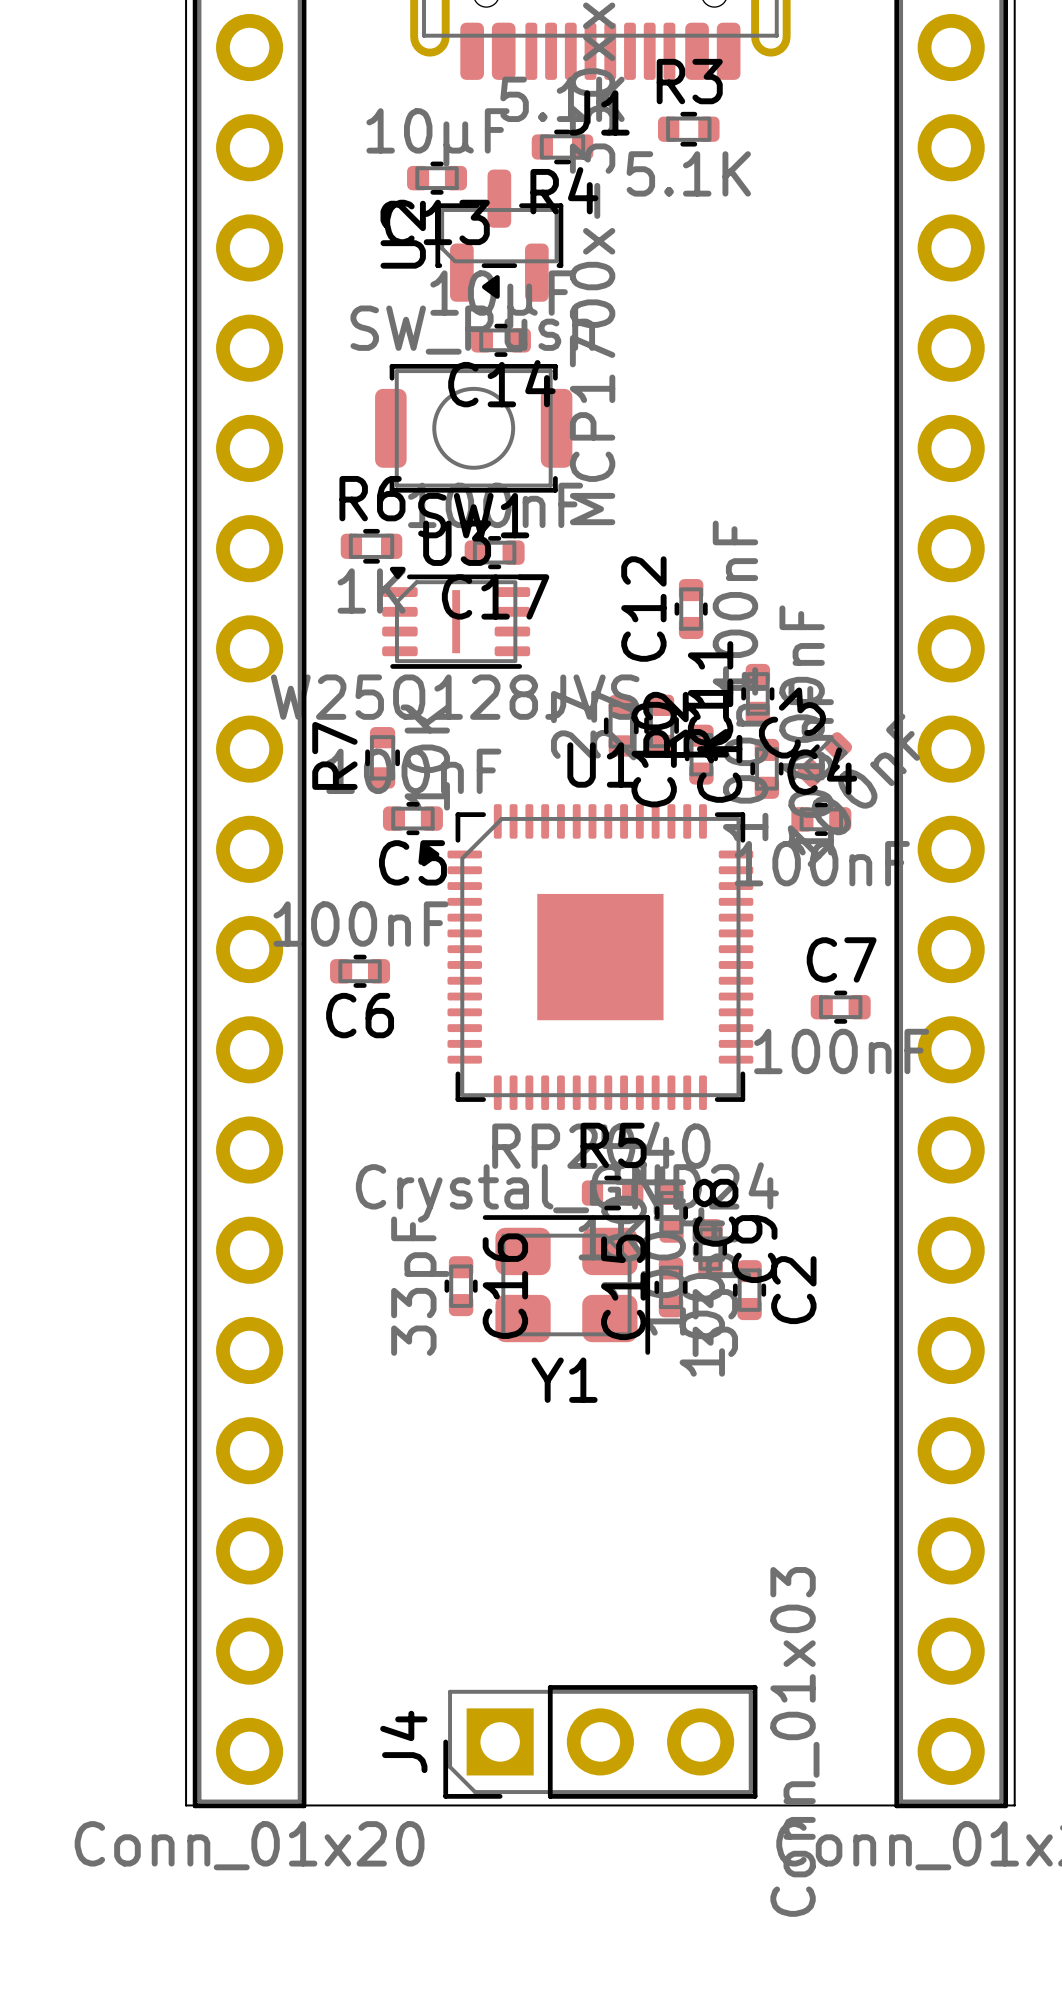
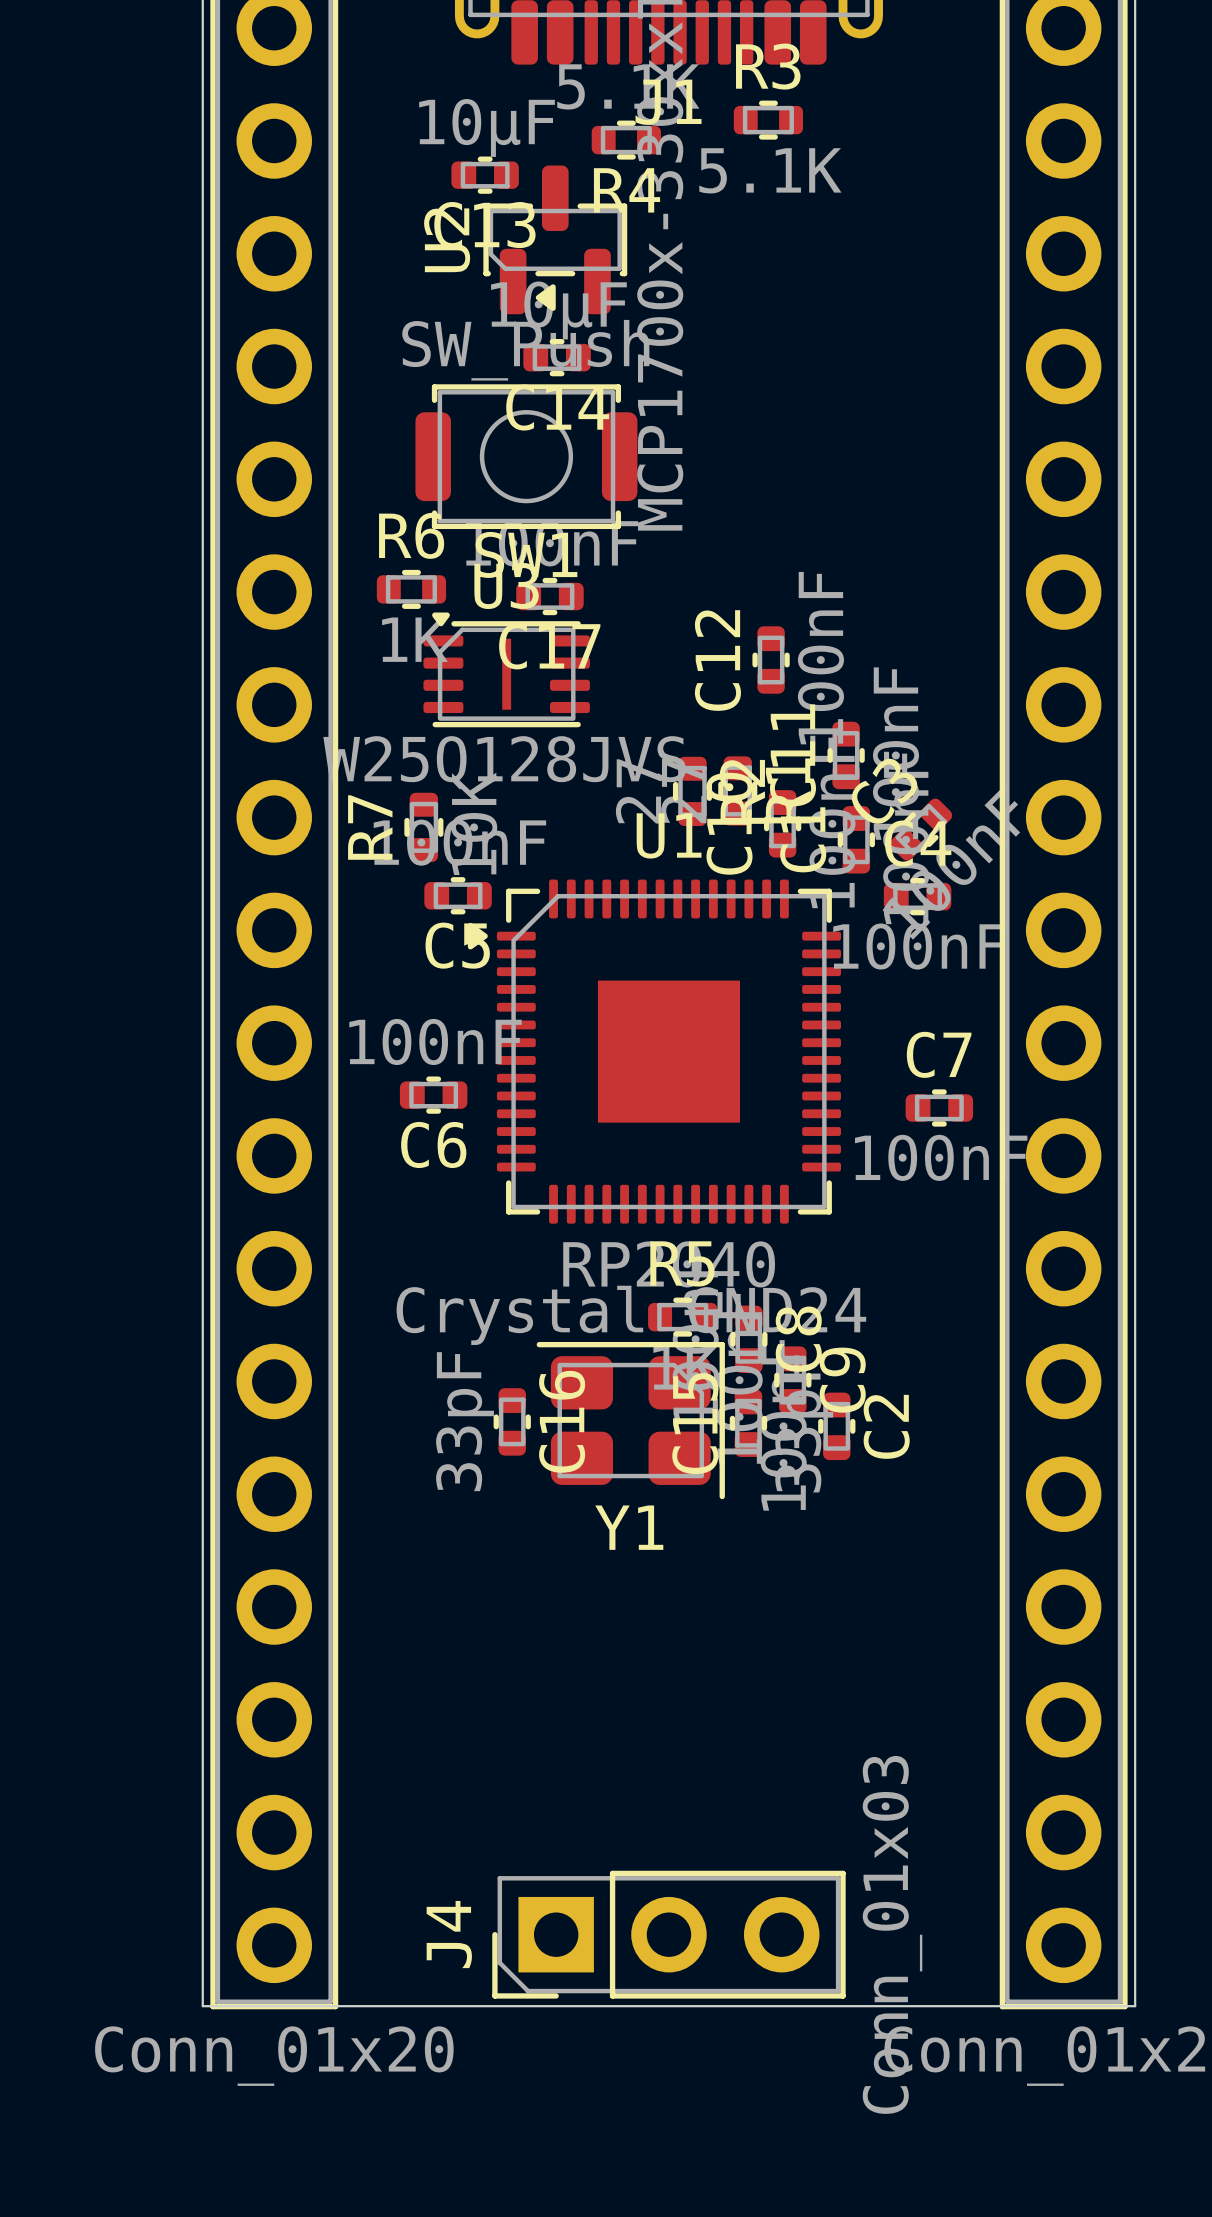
C6 position: (360, 971) -> (433, 1095)

